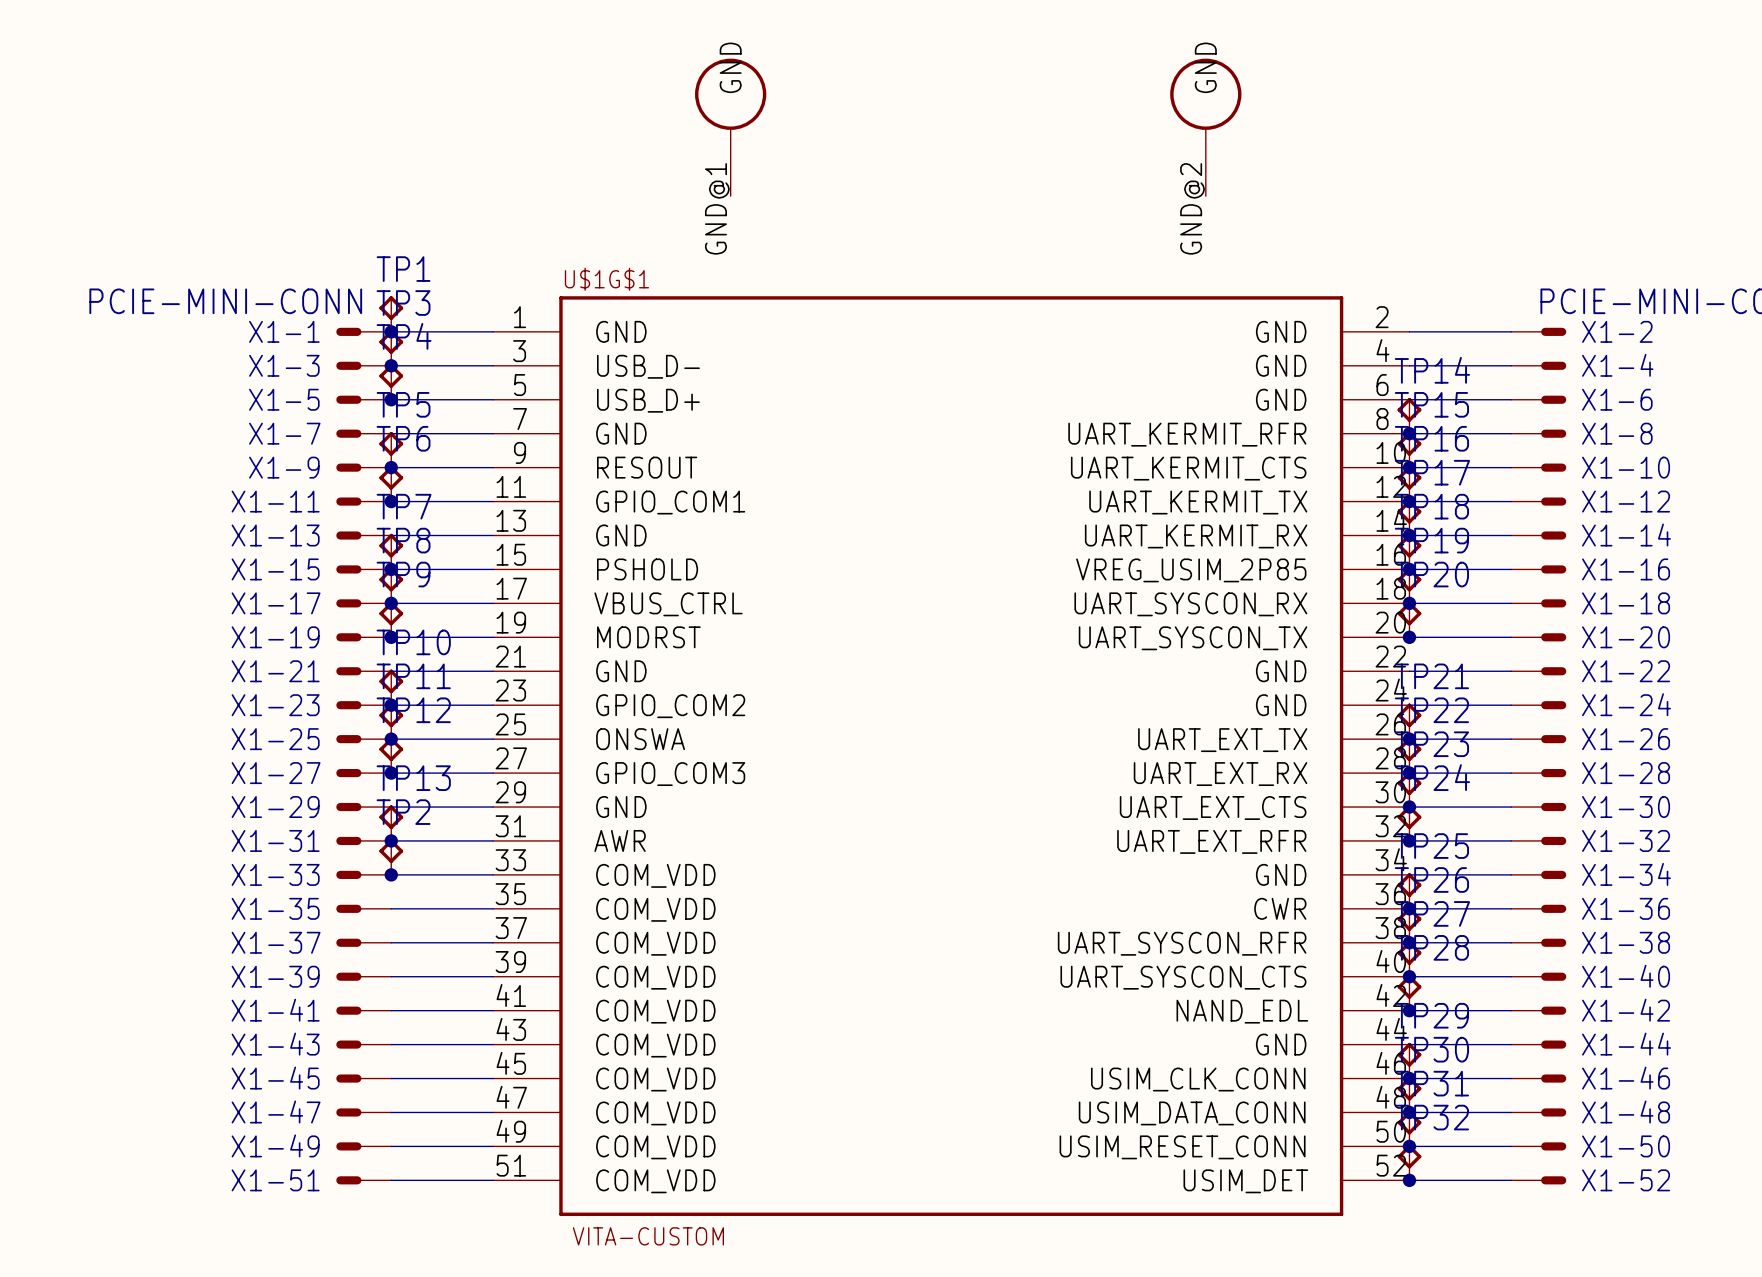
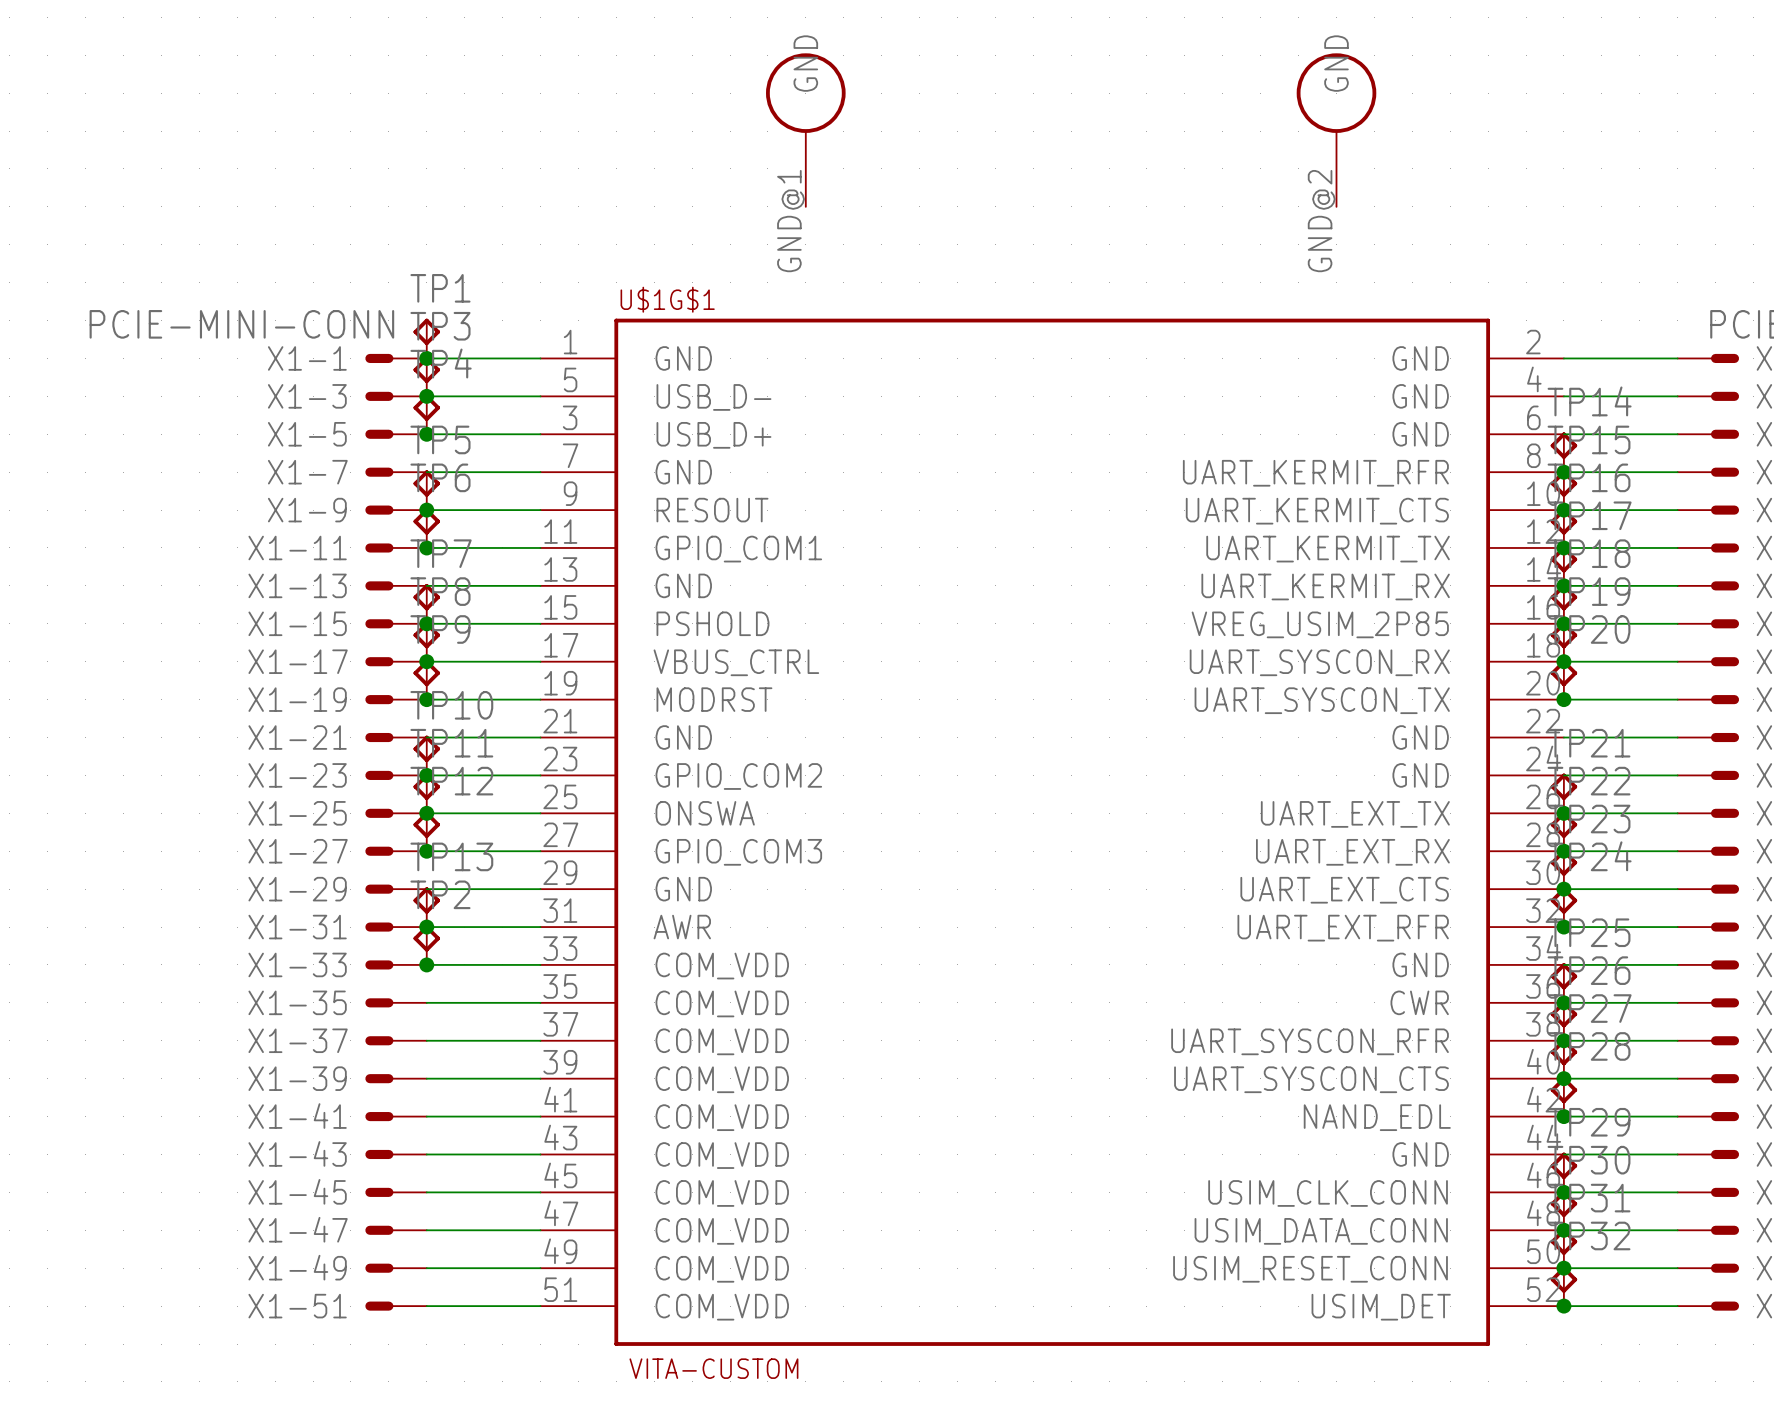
U$1G$1 pin number: 3 (519, 351) -> 5 (570, 379)
U$1G$1 pin number: 5 (520, 385) -> 3 (570, 417)

